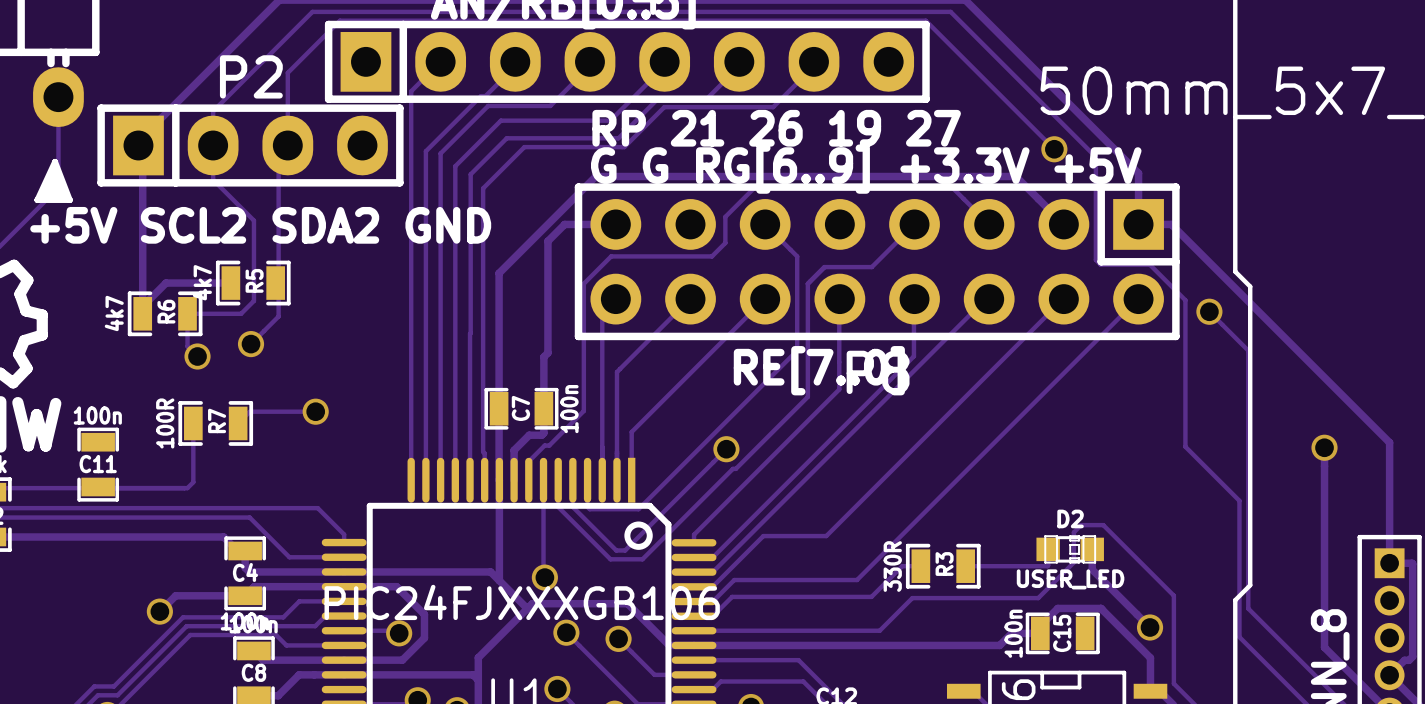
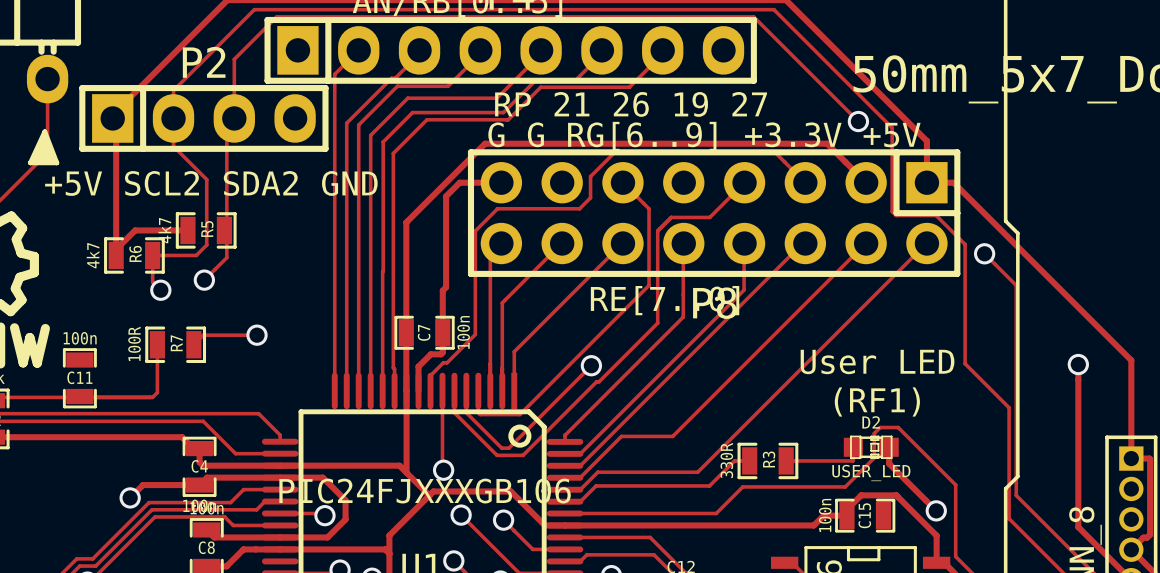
text: none -> User LED (877, 361)
text: none -> (RF1) (877, 401)

